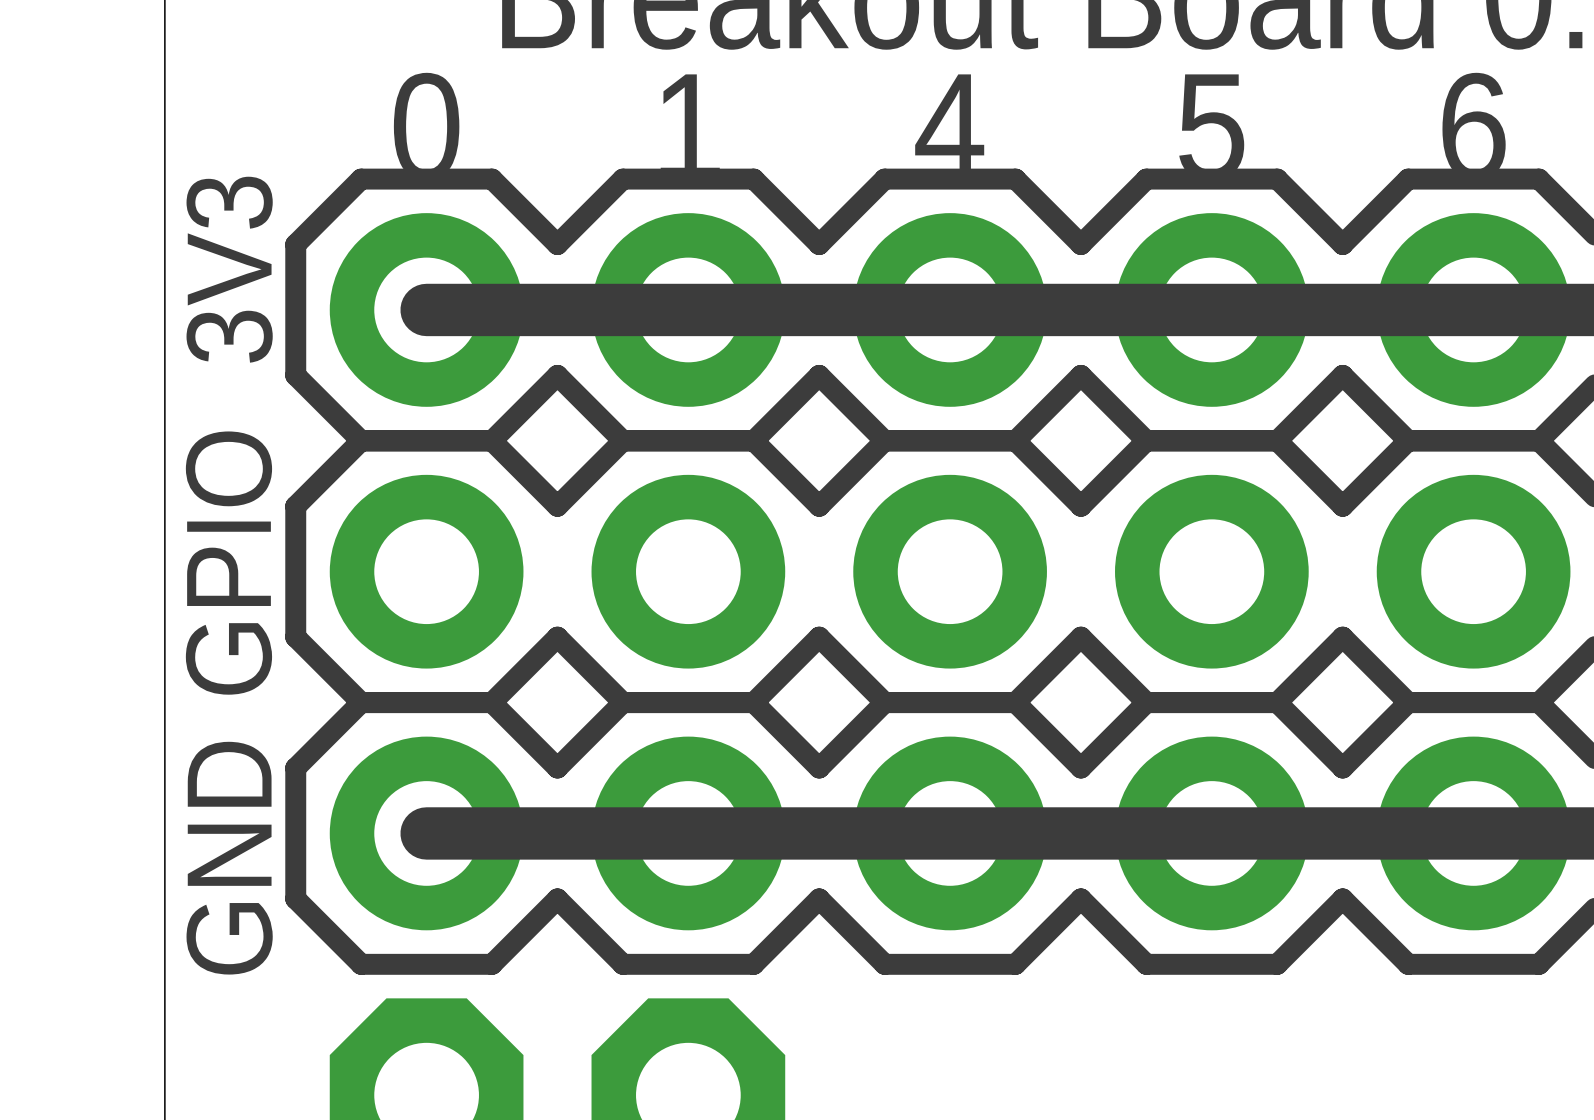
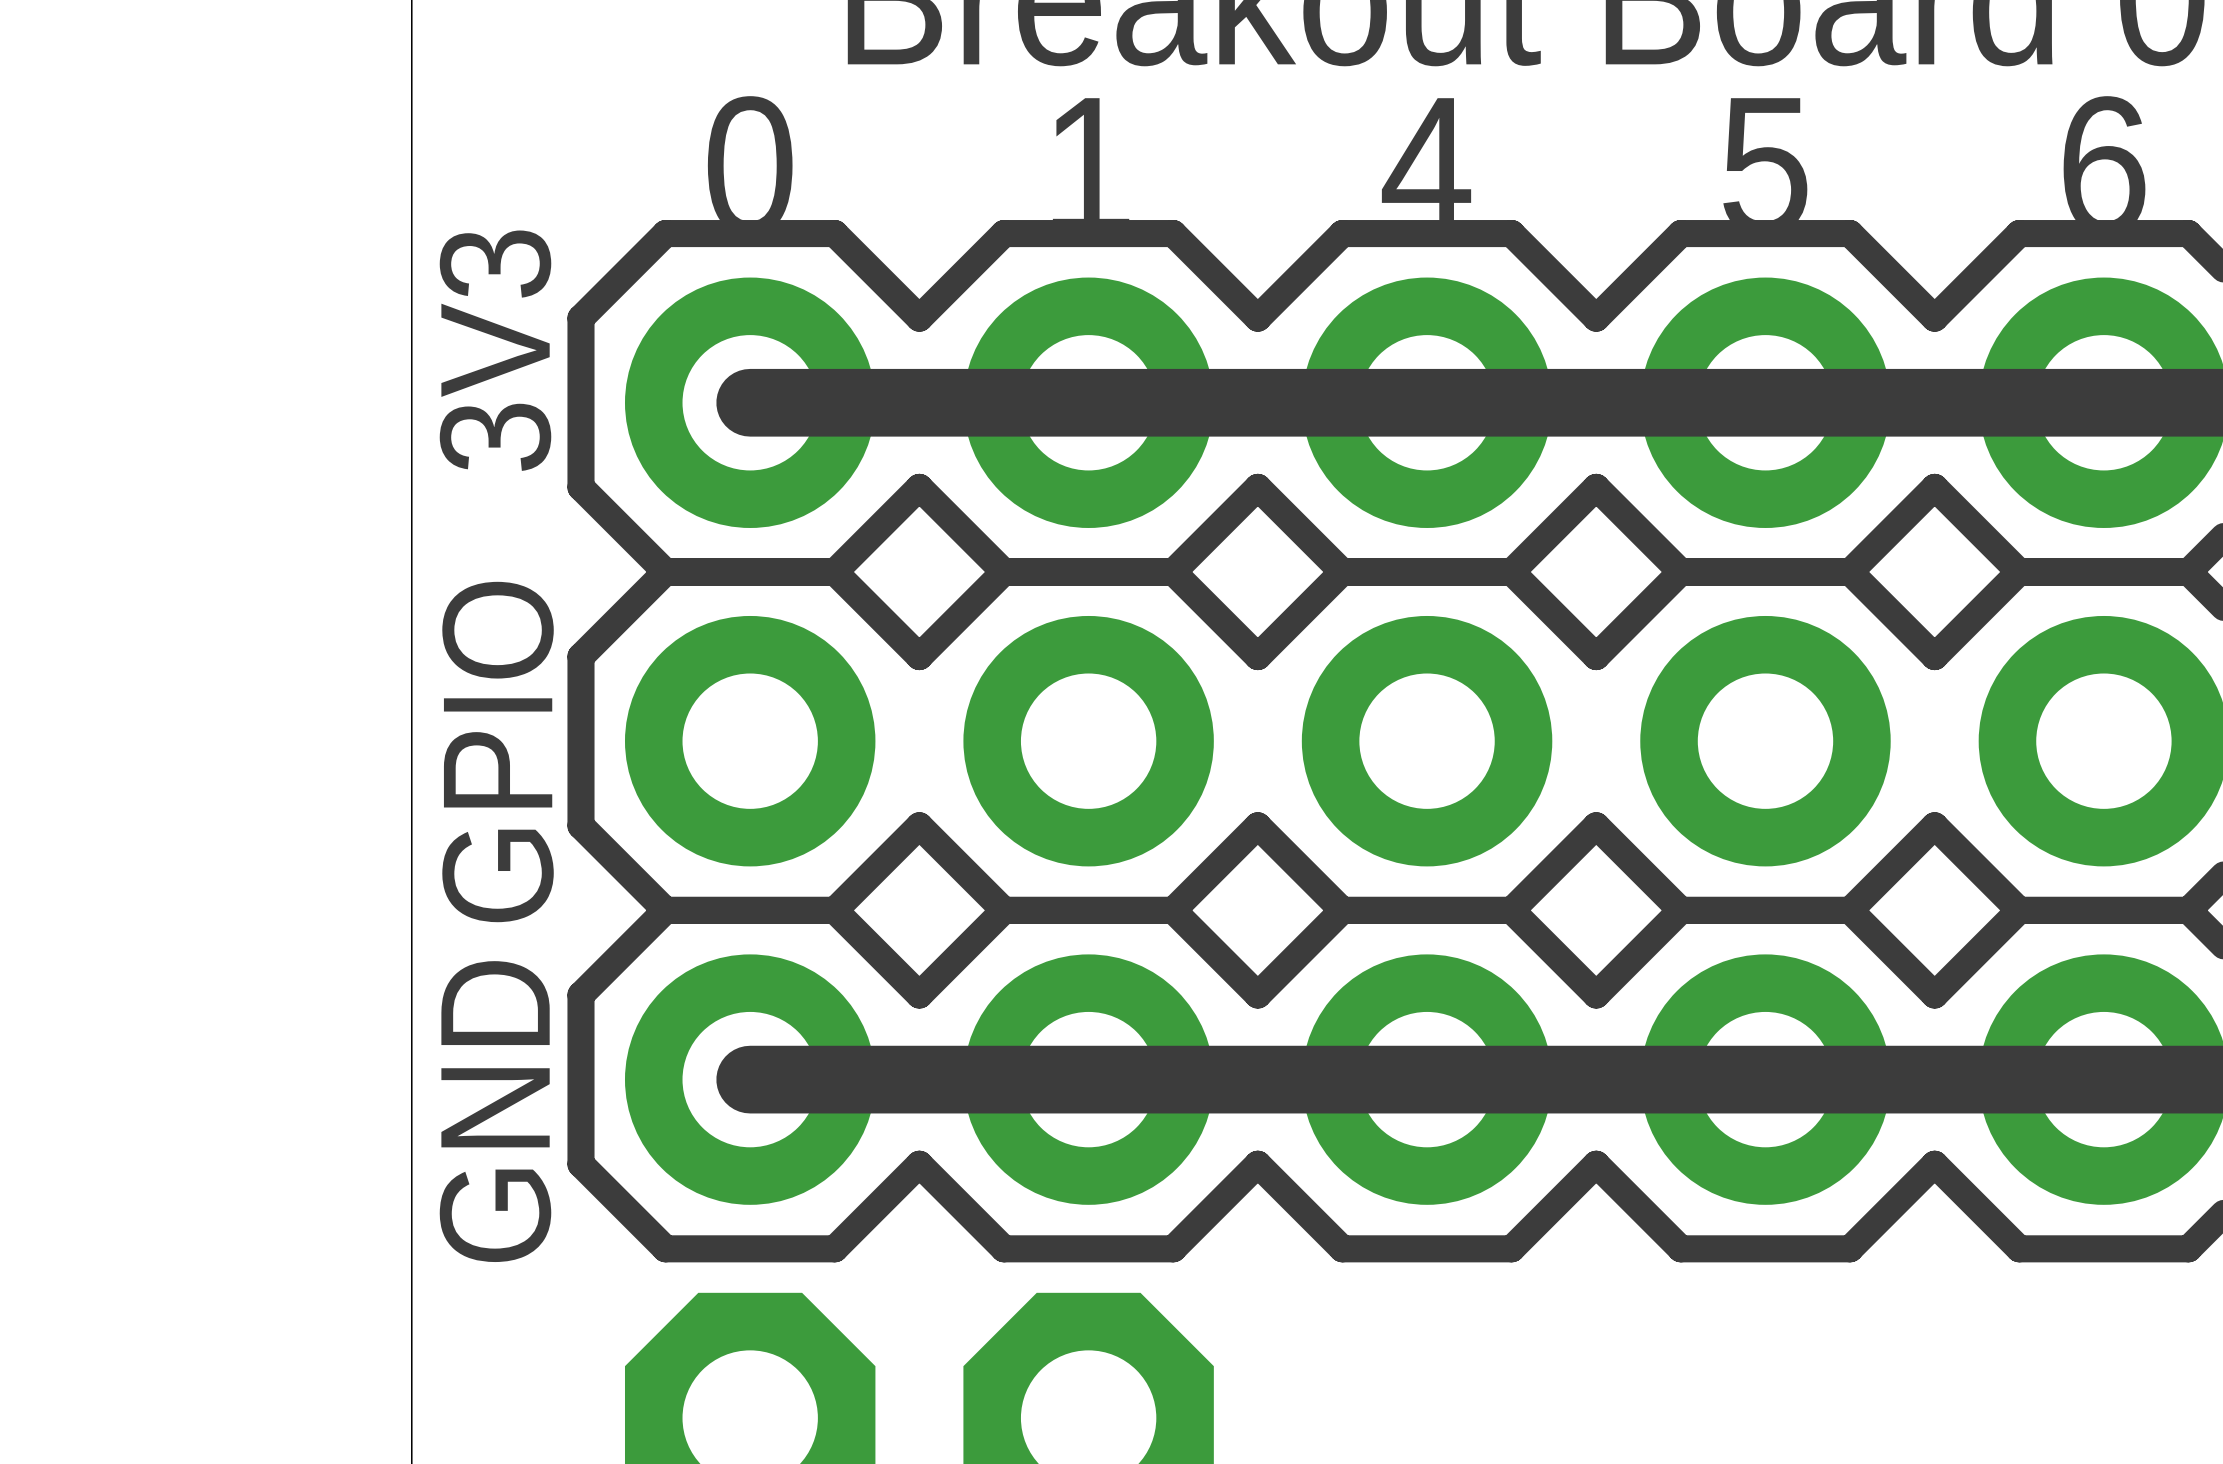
GPIO name position: GPIO (228, 563) -> GPIO (498, 752)

